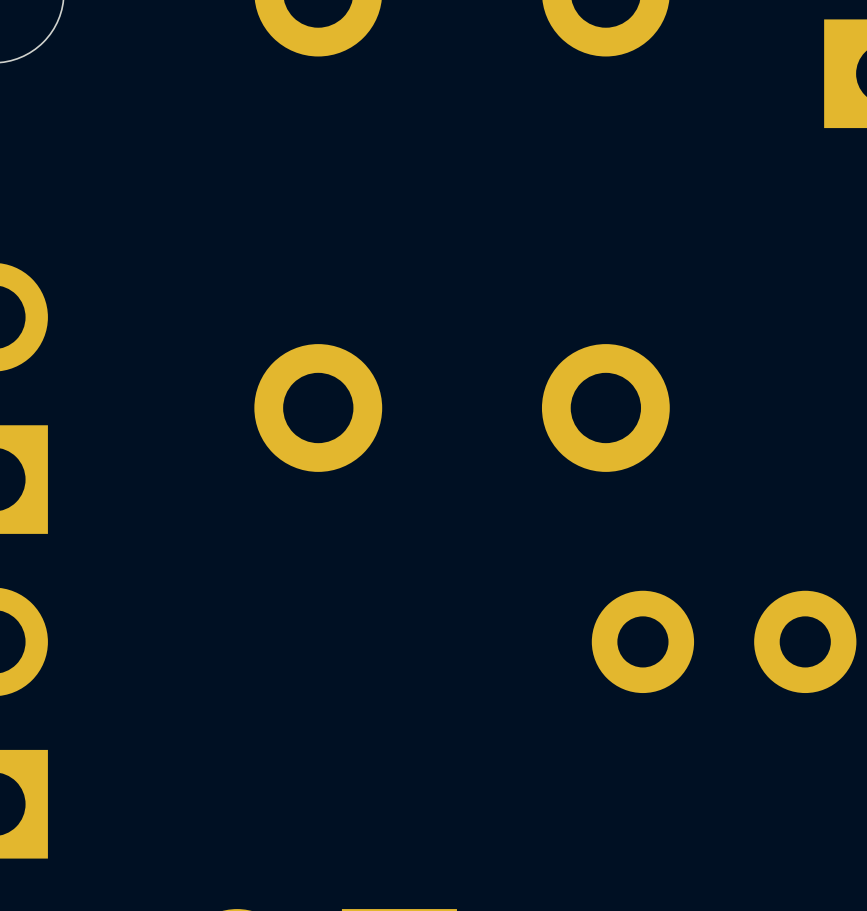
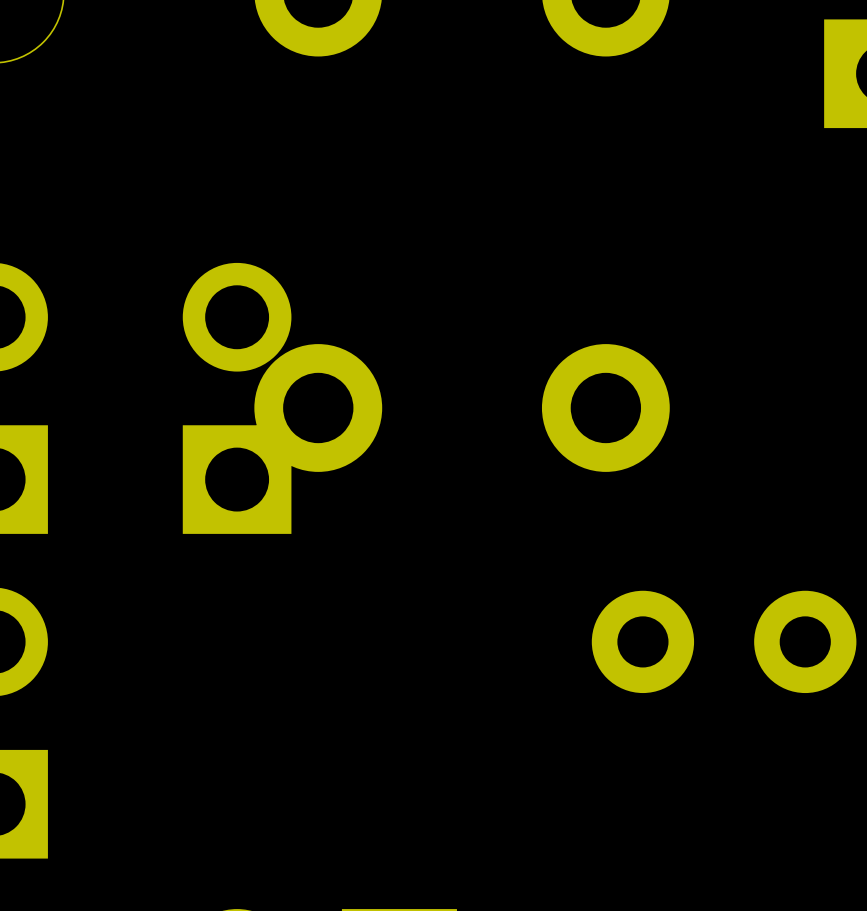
part: none -> (237, 398)

